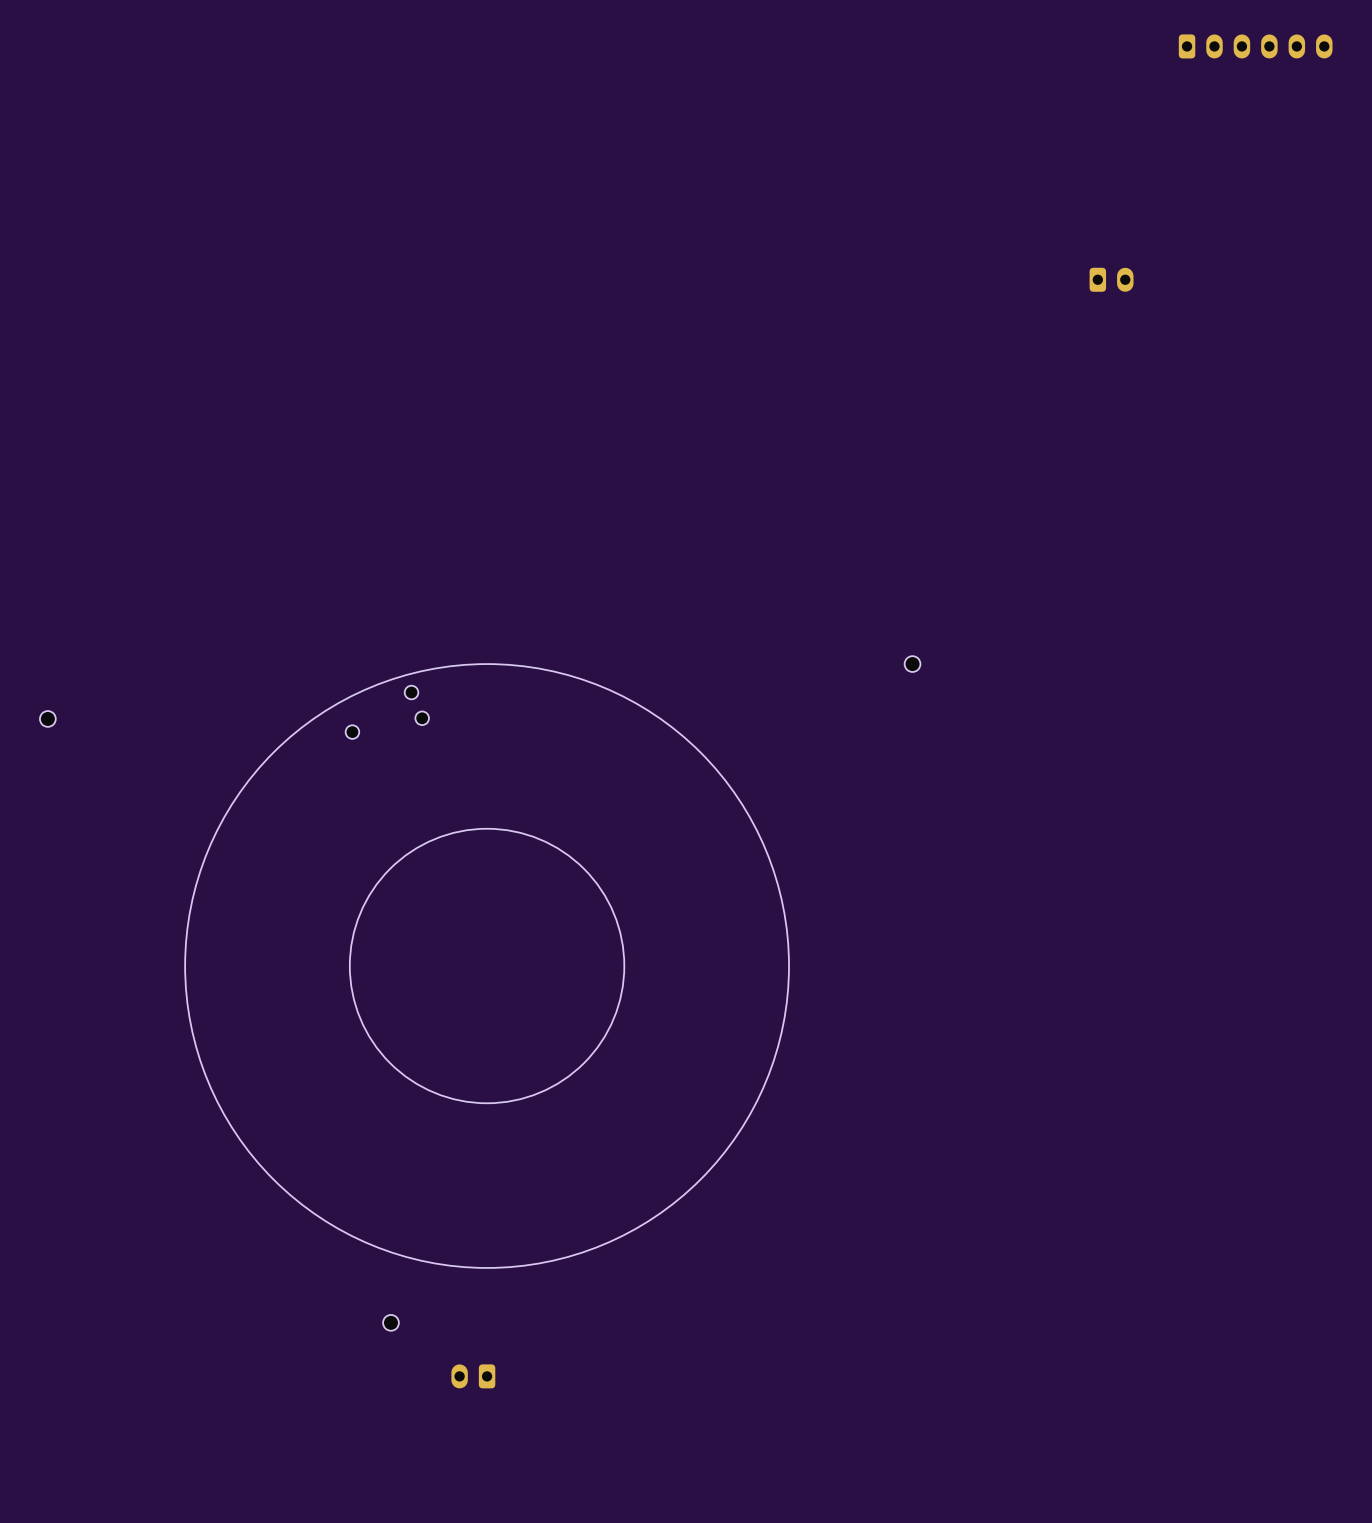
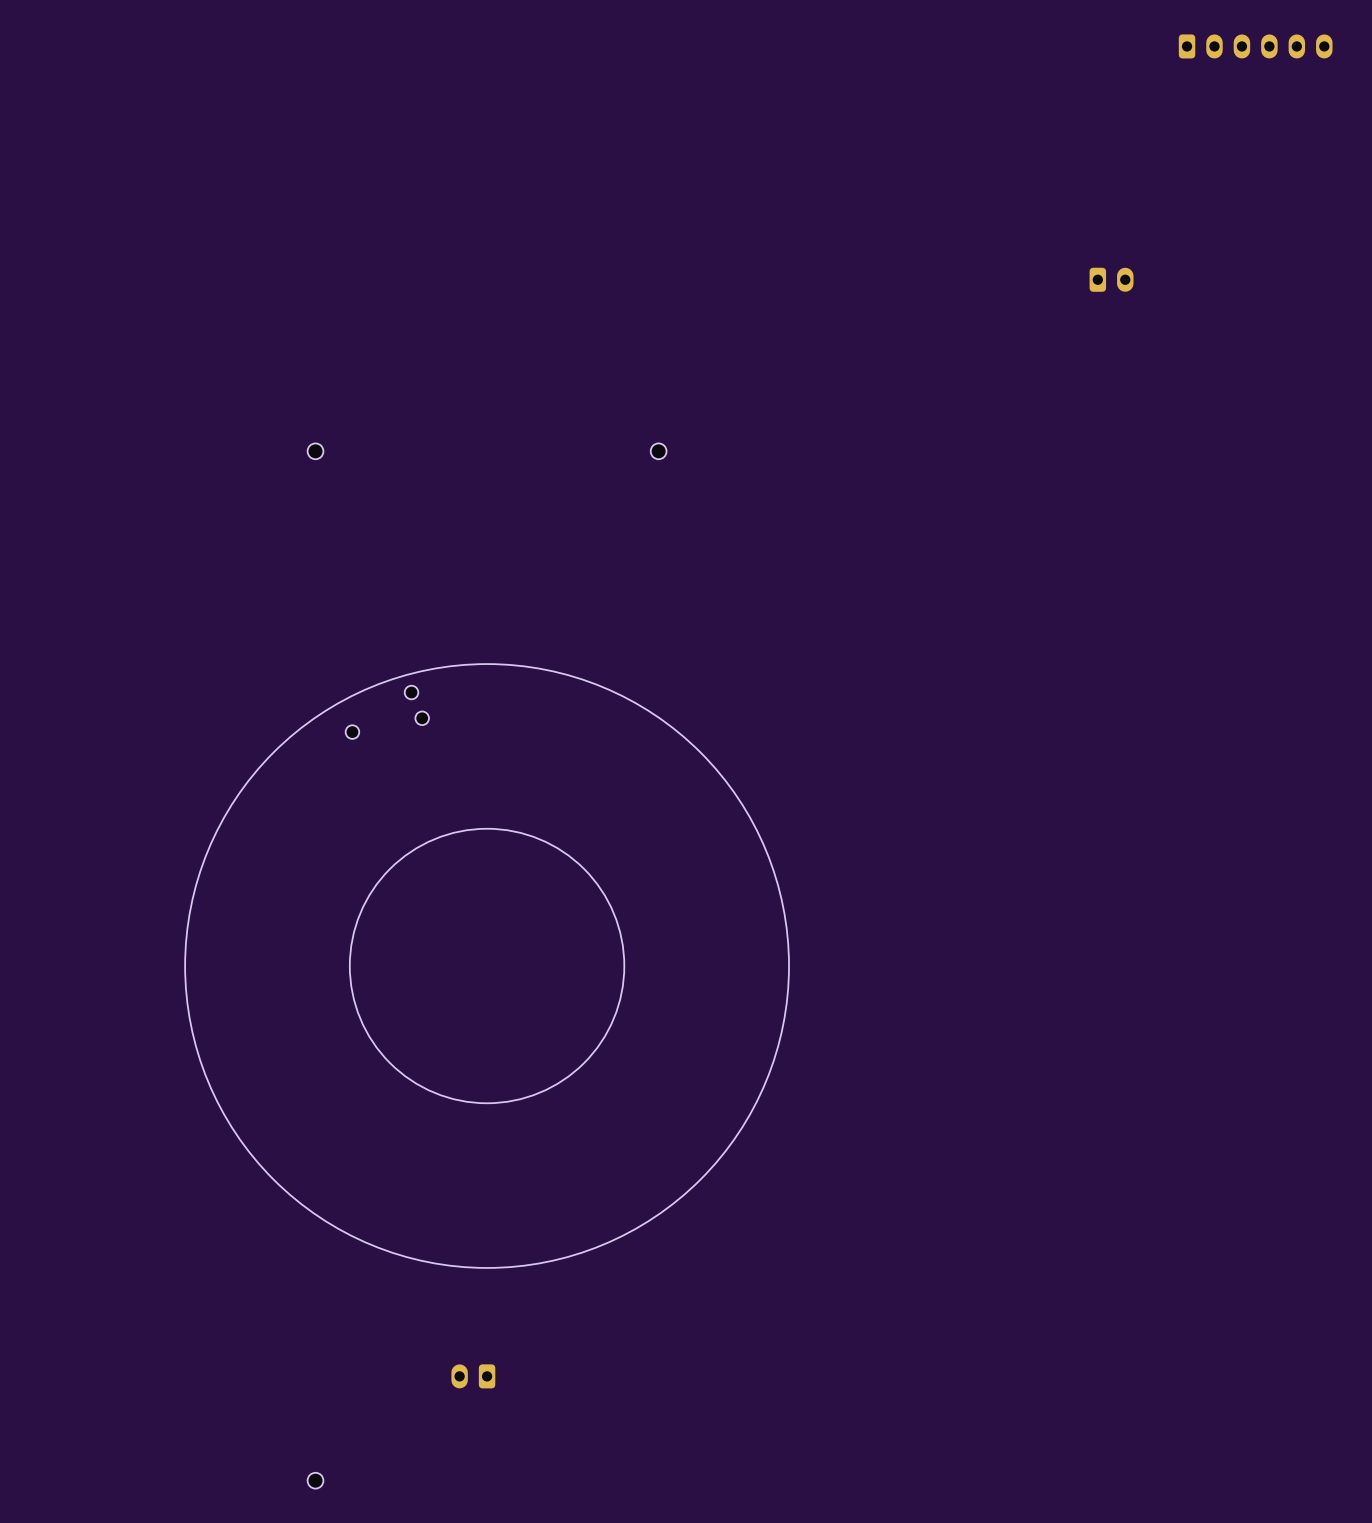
part: none -> (315, 451)
part: none -> (658, 451)
part: (912, 664) -> none
part: (47, 718) -> none
part position: (390, 1322) -> (315, 1480)

